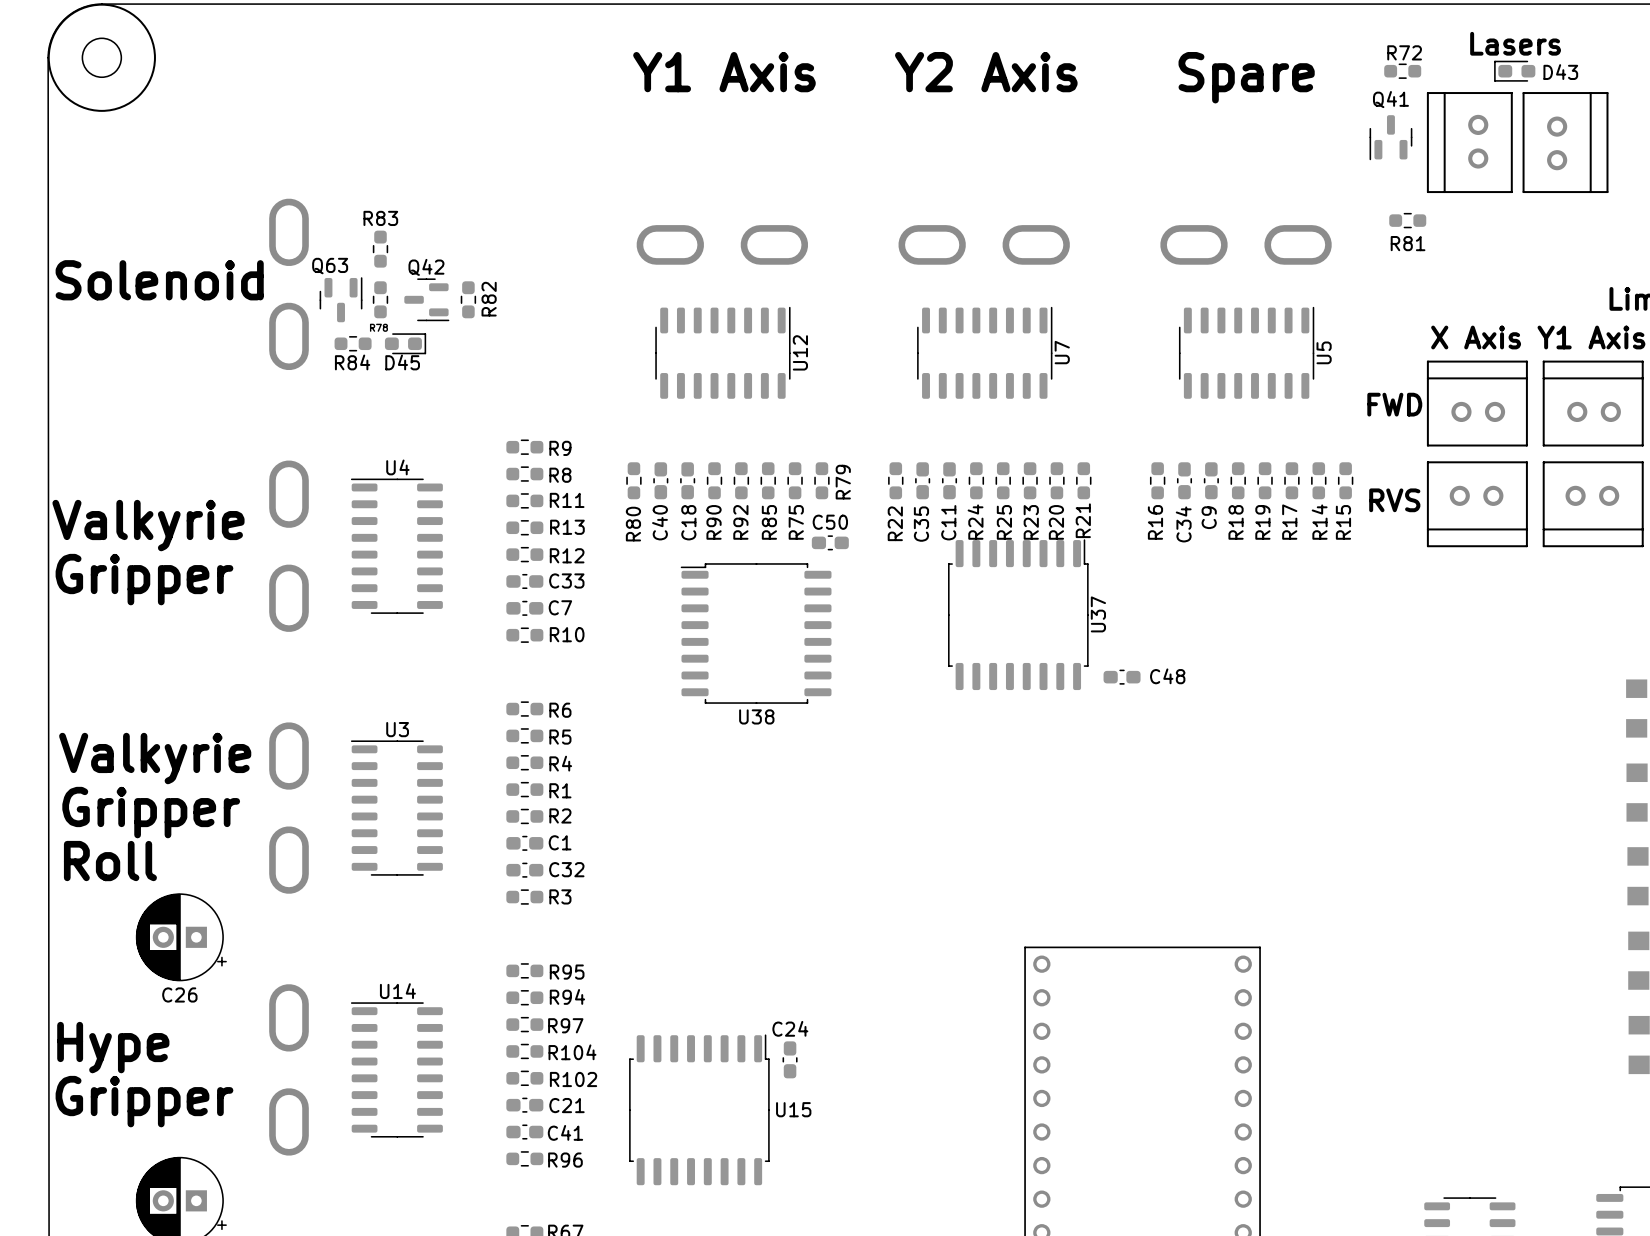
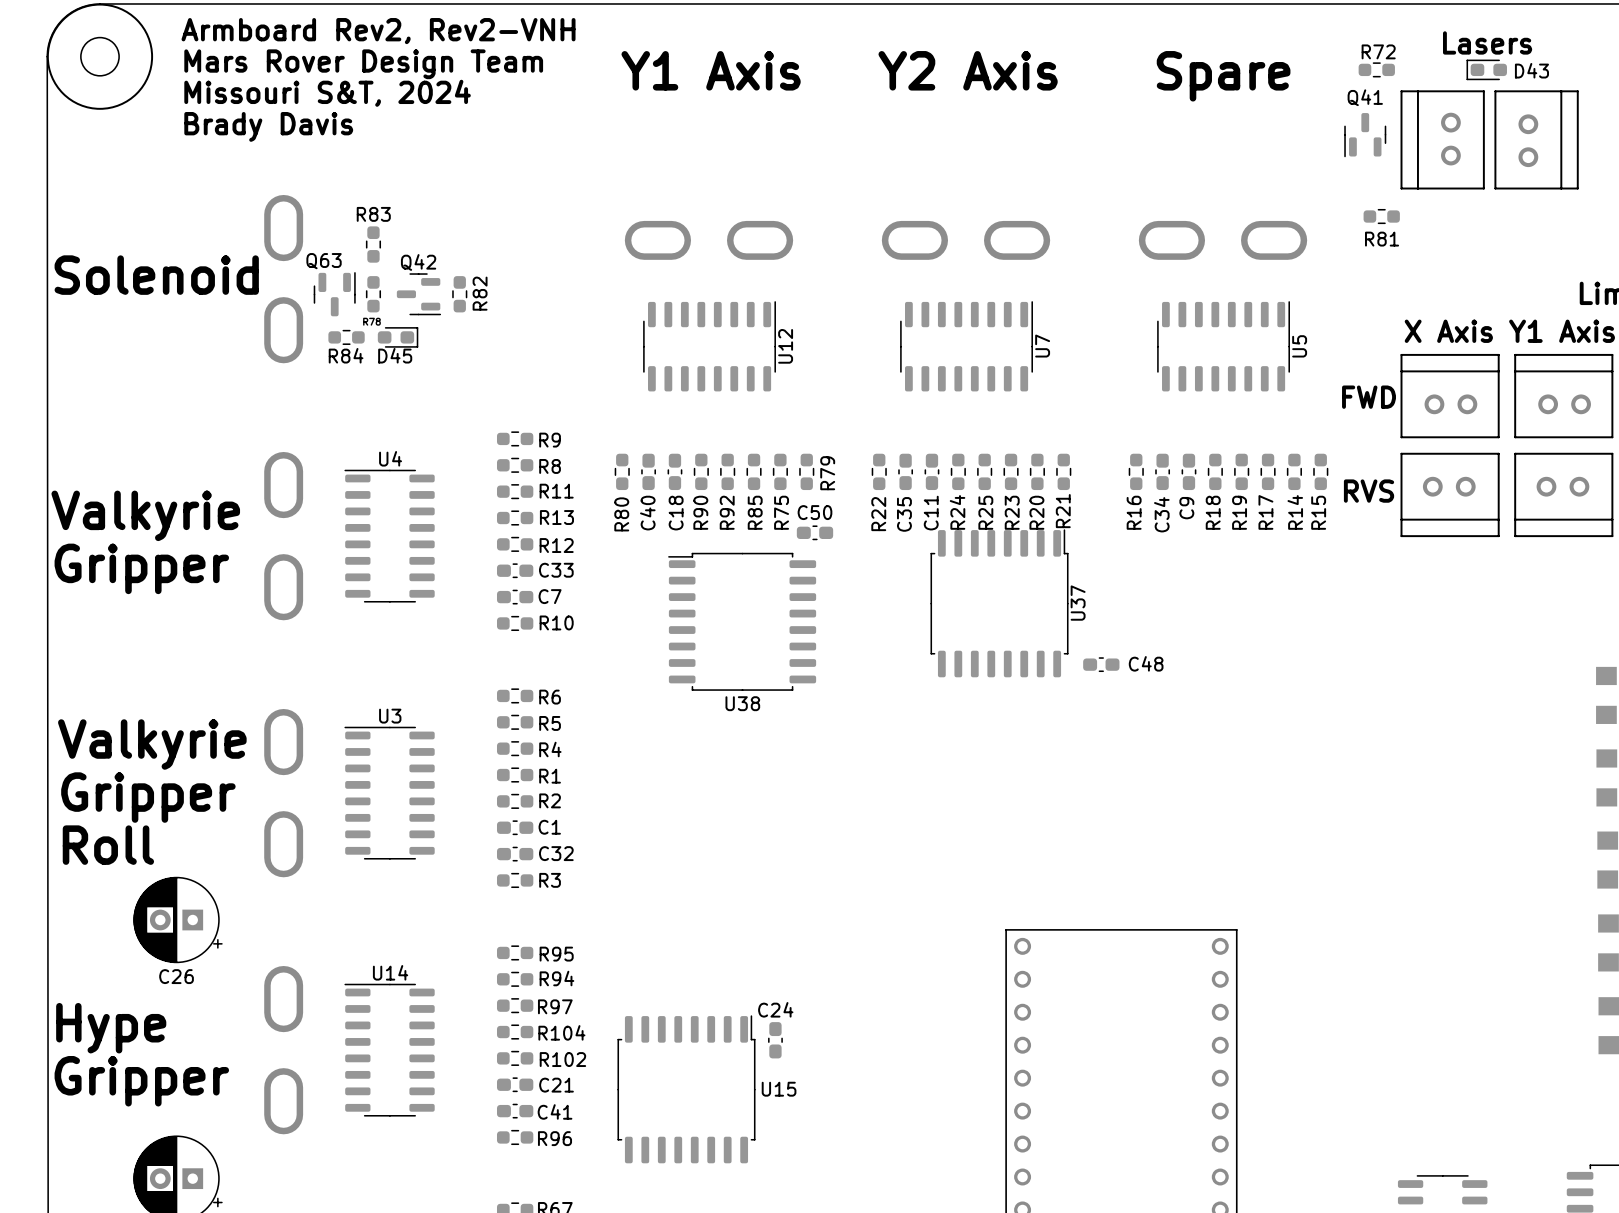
text: none -> Armboard Rev2, Rev2-VNH (378, 31)
text: none -> Mars Rover Design Team (363, 64)
text: none -> Missouri S&T, 2024 (327, 93)
text: none -> Brady Davis (268, 126)

